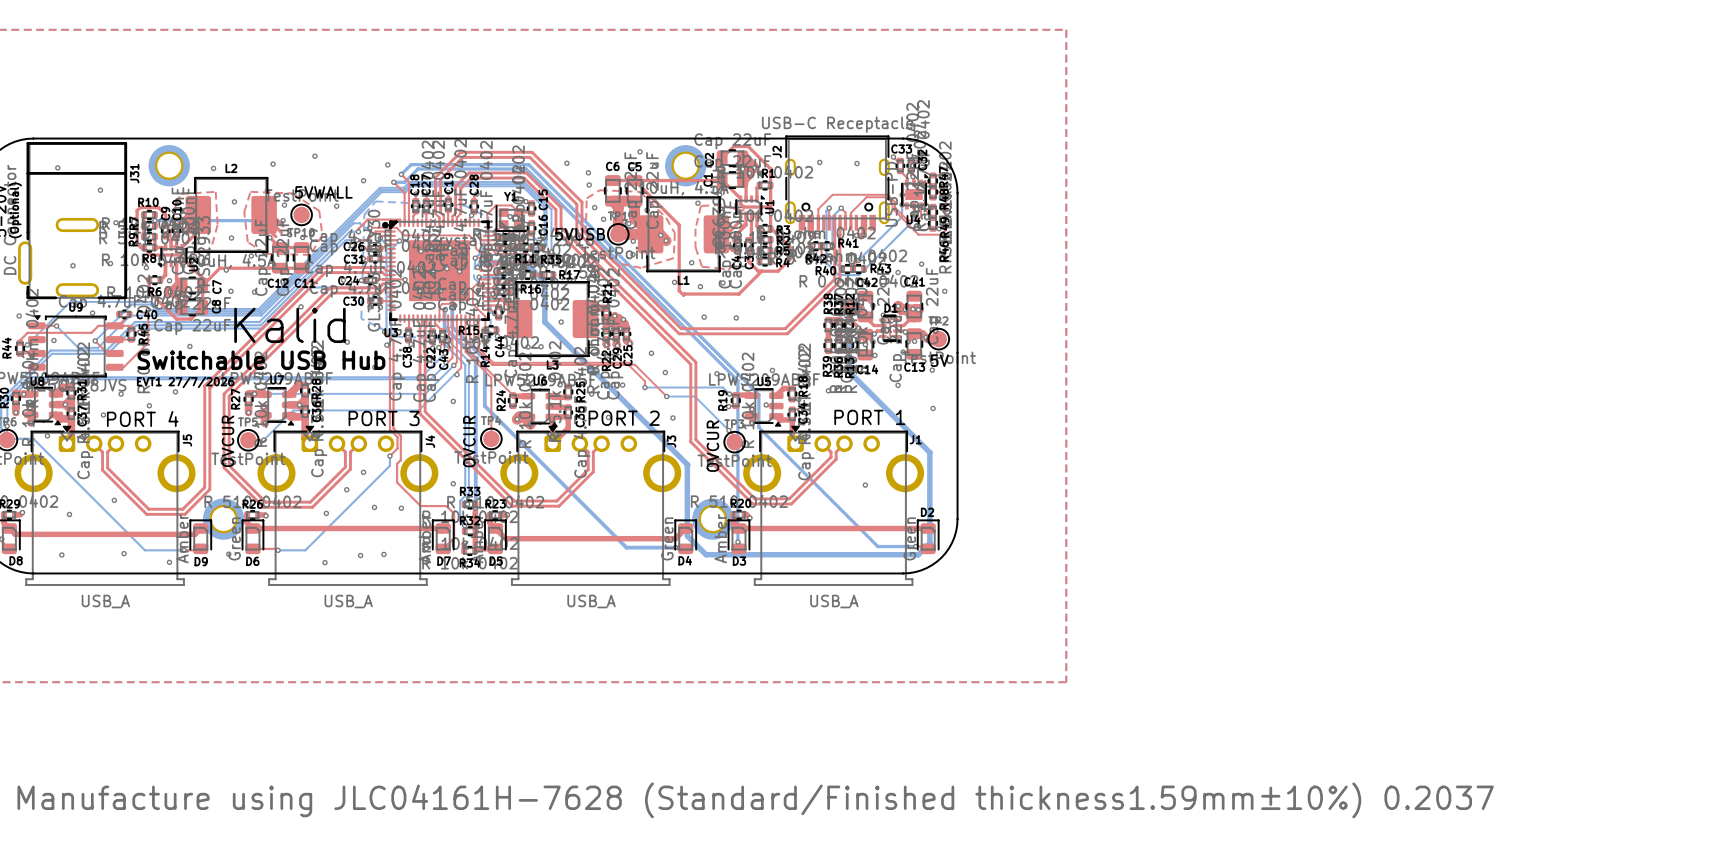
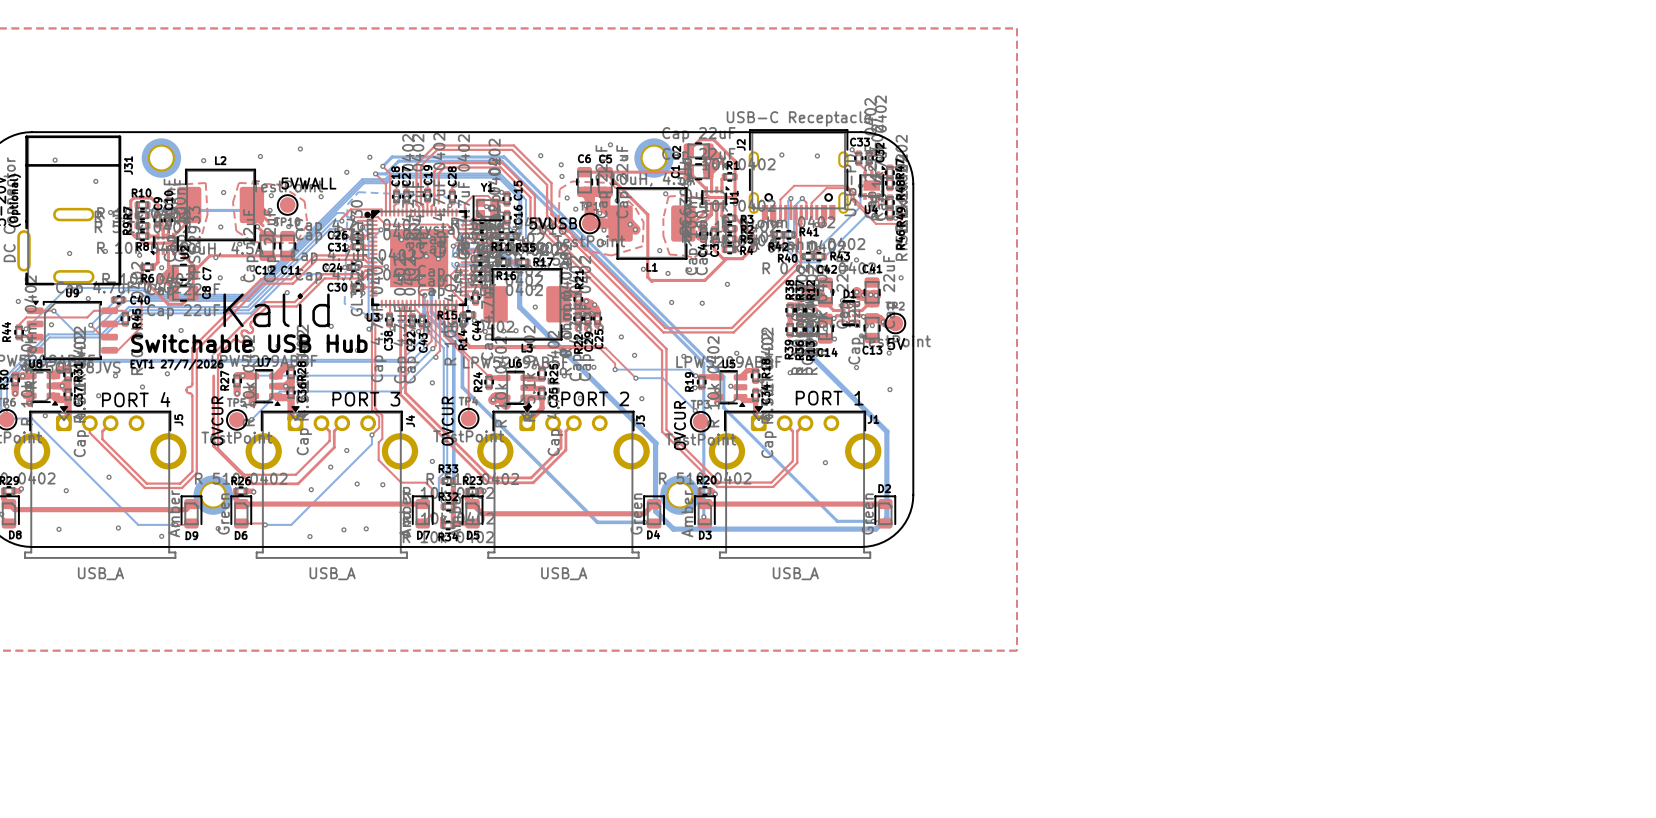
top track: (455, 213) (455, 186) (469, 172) (526, 172) (561, 207) (561, 227) (695, 362) (695, 439) (755, 498) (789, 498) (831, 457) (831, 452) -> (434, 201) (434, 203) (434, 171) (442, 163) (502, 163) (534, 195) (534, 217) (666, 348) (666, 429) (719, 482) (771, 482) (792, 461) (792, 431)
top track: (443, 216) (440, 212) (440, 179) (462, 157) (529, 157) (576, 204) (576, 231) (679, 333) (787, 333) (839, 281) (839, 234) -> (423, 206) (420, 204) (420, 166) (437, 149) (512, 149) (547, 184) (547, 216) (663, 332) (733, 332) (800, 265) (801, 223)
top track: (439, 217) (435, 213) (435, 177) (460, 152) (532, 152) (581, 202) (581, 229) (681, 328) (785, 328) (834, 279) (834, 234) -> (419, 207) (416, 204) (416, 164) (435, 145) (513, 145) (551, 183) (551, 214) (665, 328) (731, 328) (796, 263) (796, 223)
top track: (456, 217) (460, 213) (460, 188) (471, 178) (524, 178) (555, 209) (555, 229) (690, 364) (690, 441) (752, 503) (791, 503) (836, 459) (836, 452) -> (438, 203) (438, 173) (444, 167) (500, 167) (530, 197) (530, 219) (662, 350) (662, 431) (717, 486) (773, 486) (797, 462) (797, 431)
top track: (382, 267) (323, 267) (204, 385) (204, 487) (182, 509) (148, 509) (107, 468) (107, 452) -> (362, 255) (365, 255) (315, 255) (291, 279) (261, 279) (192, 347) (192, 384) (186, 389) (192, 395) (192, 471) (180, 483) (146, 483) (102, 439) (102, 431)
top track: (382, 272) (325, 272) (209, 388) (209, 489) (184, 514) (146, 514) (102, 470) (102, 452) (94, 443) -> (364, 259) (316, 259) (293, 283) (262, 283) (196, 349) (196, 473) (182, 487) (144, 487) (89, 432) (89, 423)
top track: (383, 283) (378, 287) (330, 287) (224, 394) -> none
top track: none -> (363, 274) (322, 274) (294, 302) (265, 302) (213, 353)
top track: (380, 293) (332, 293) (229, 396) (229, 465) (265, 502) (310, 502) (345, 467) (345, 452) -> (363, 278) (324, 278) (296, 306) (267, 306) (250, 322) (252, 332) (249, 333) (244, 330) (241, 331) (243, 341) (234, 339) (218, 355) (218, 448) (244, 474) (295, 474) (329, 440) (329, 431)
text: Manufacture using JLC04161H-7628 (Standard/Finished thickness1.59mm±10%) 0.2037 (755, 800) -> none

